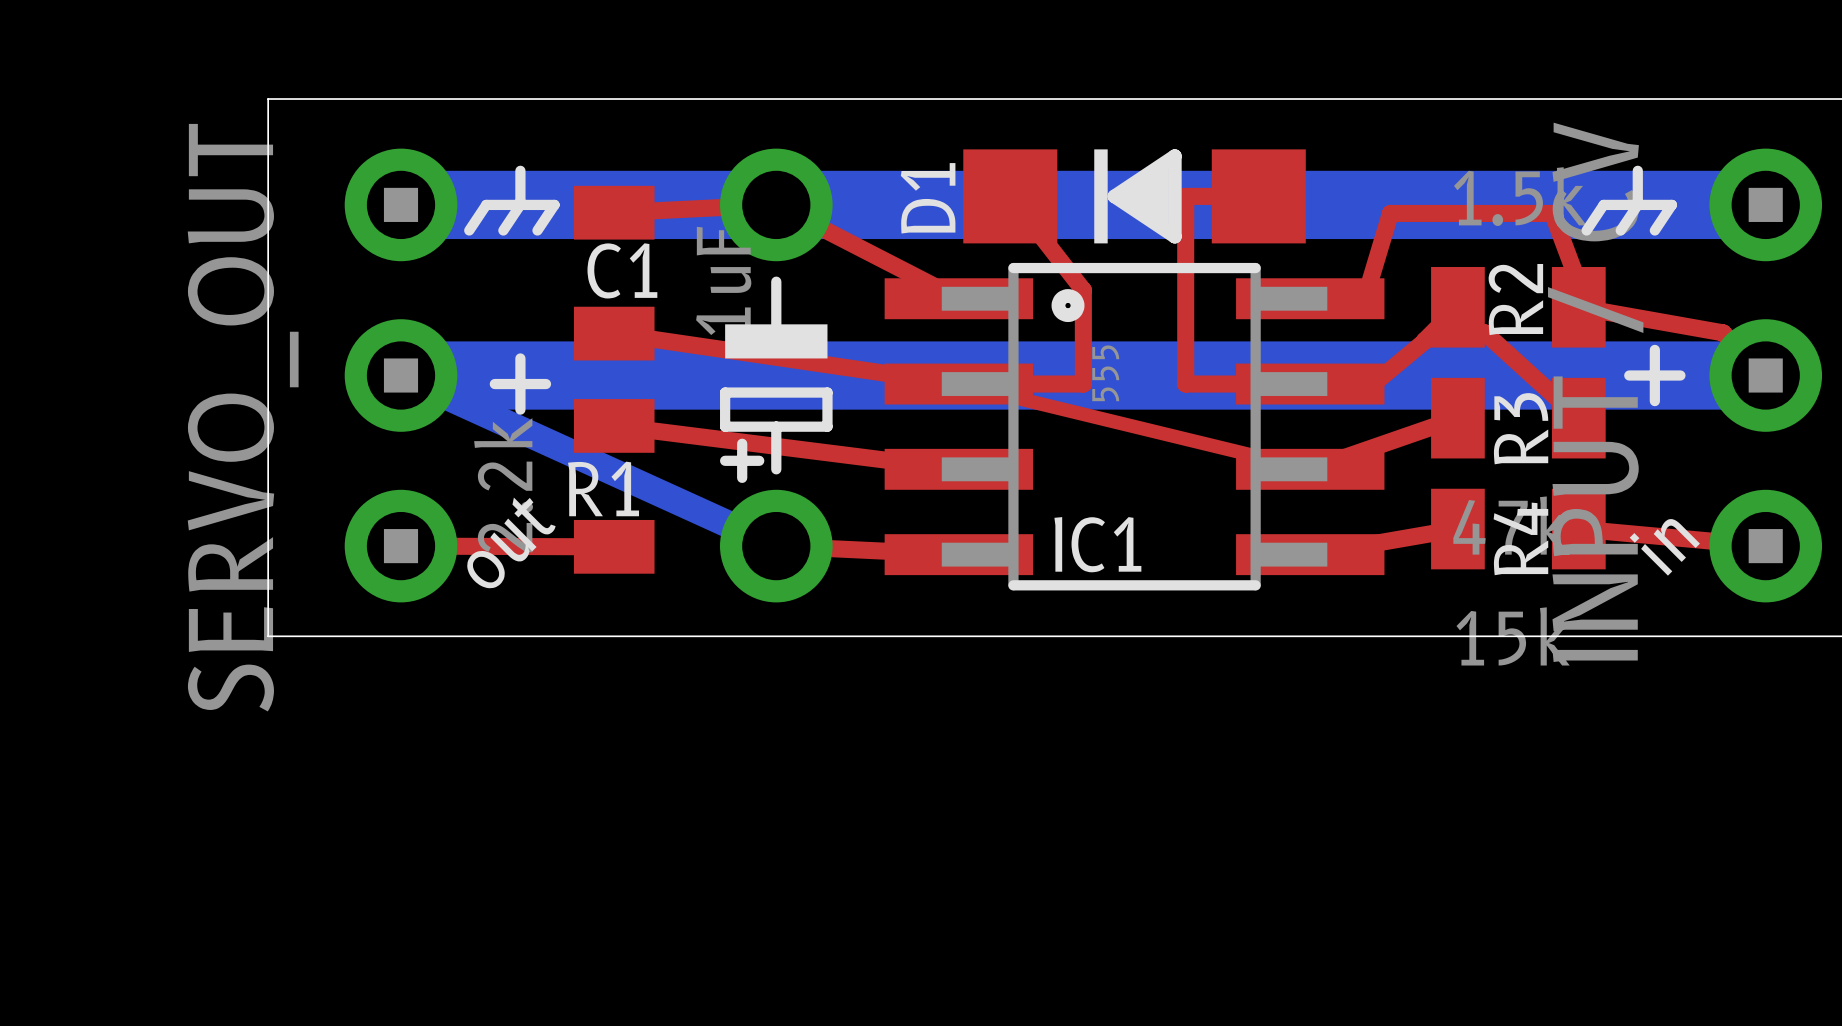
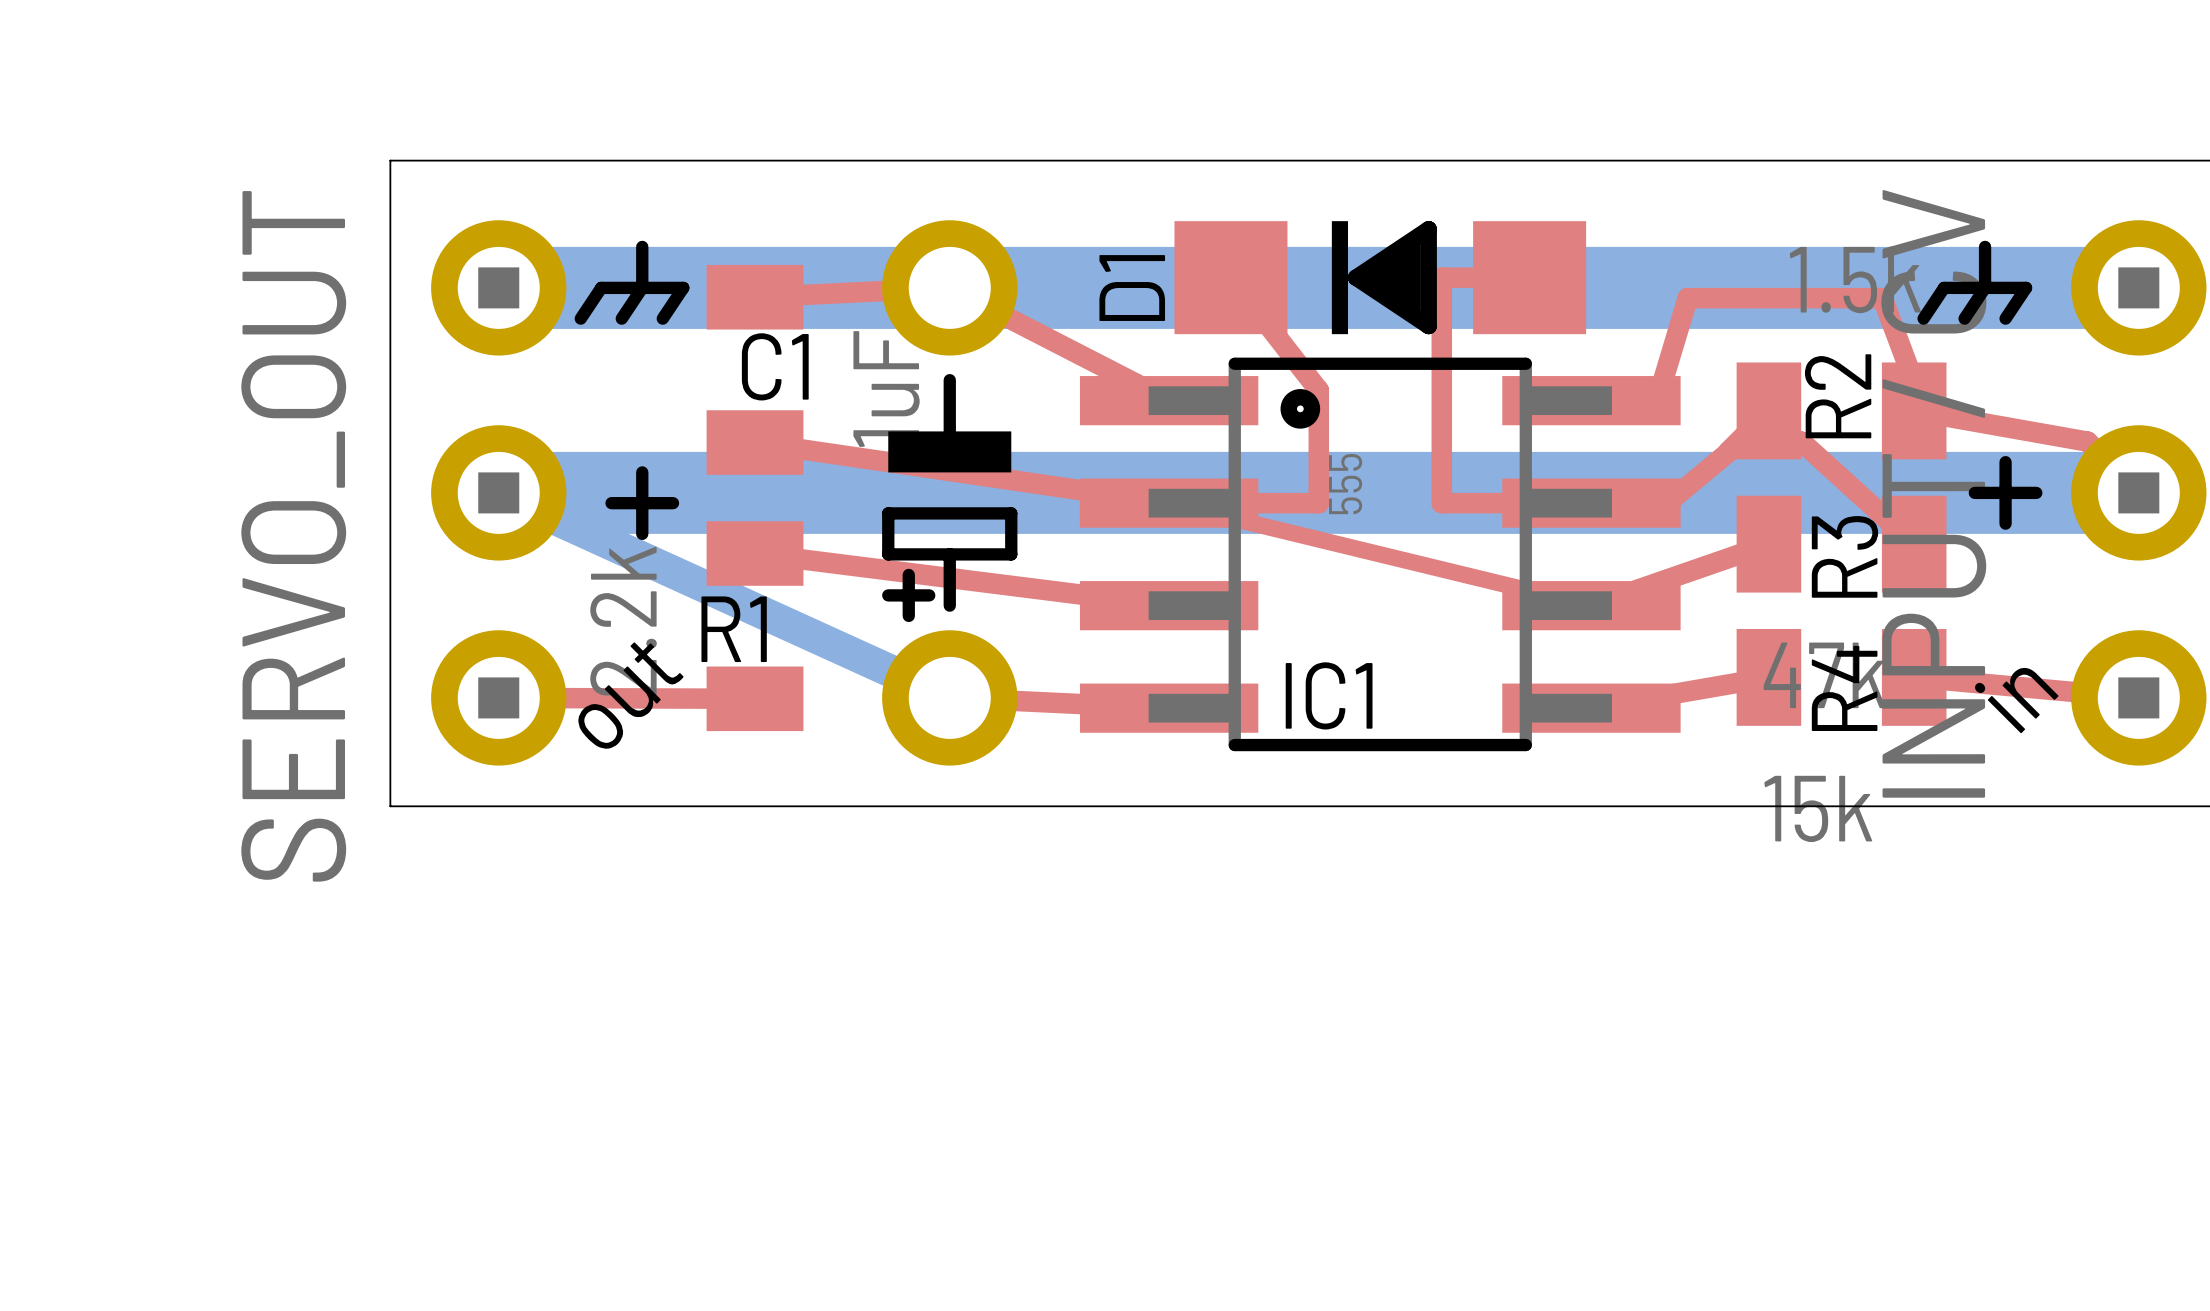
board edge: (310, 99) (268, 99) (268, 636) (310, 636) -> (390, 160) (390, 806)

